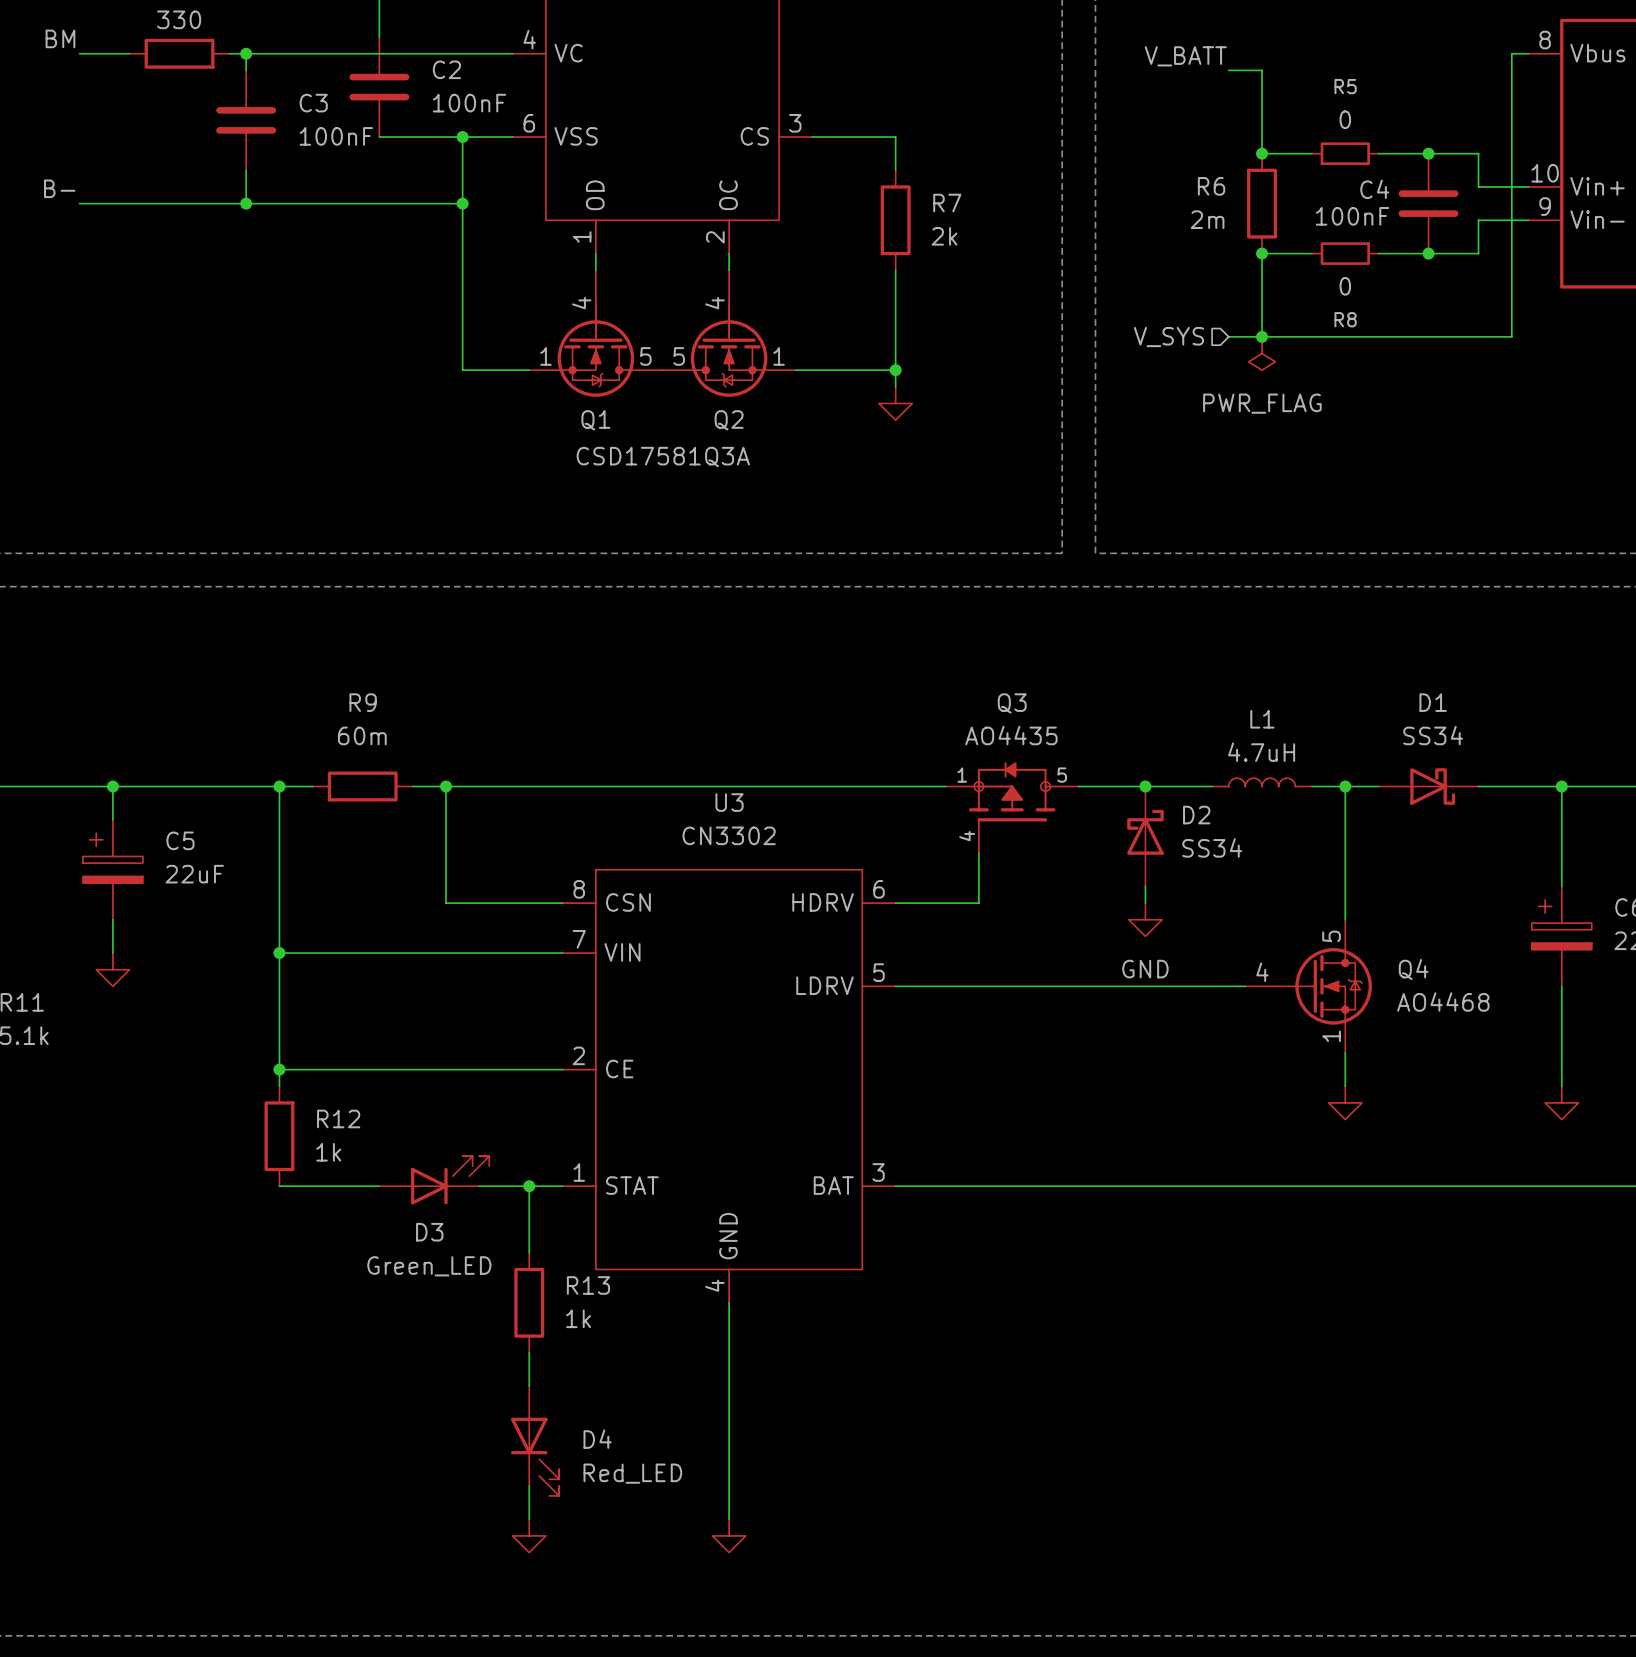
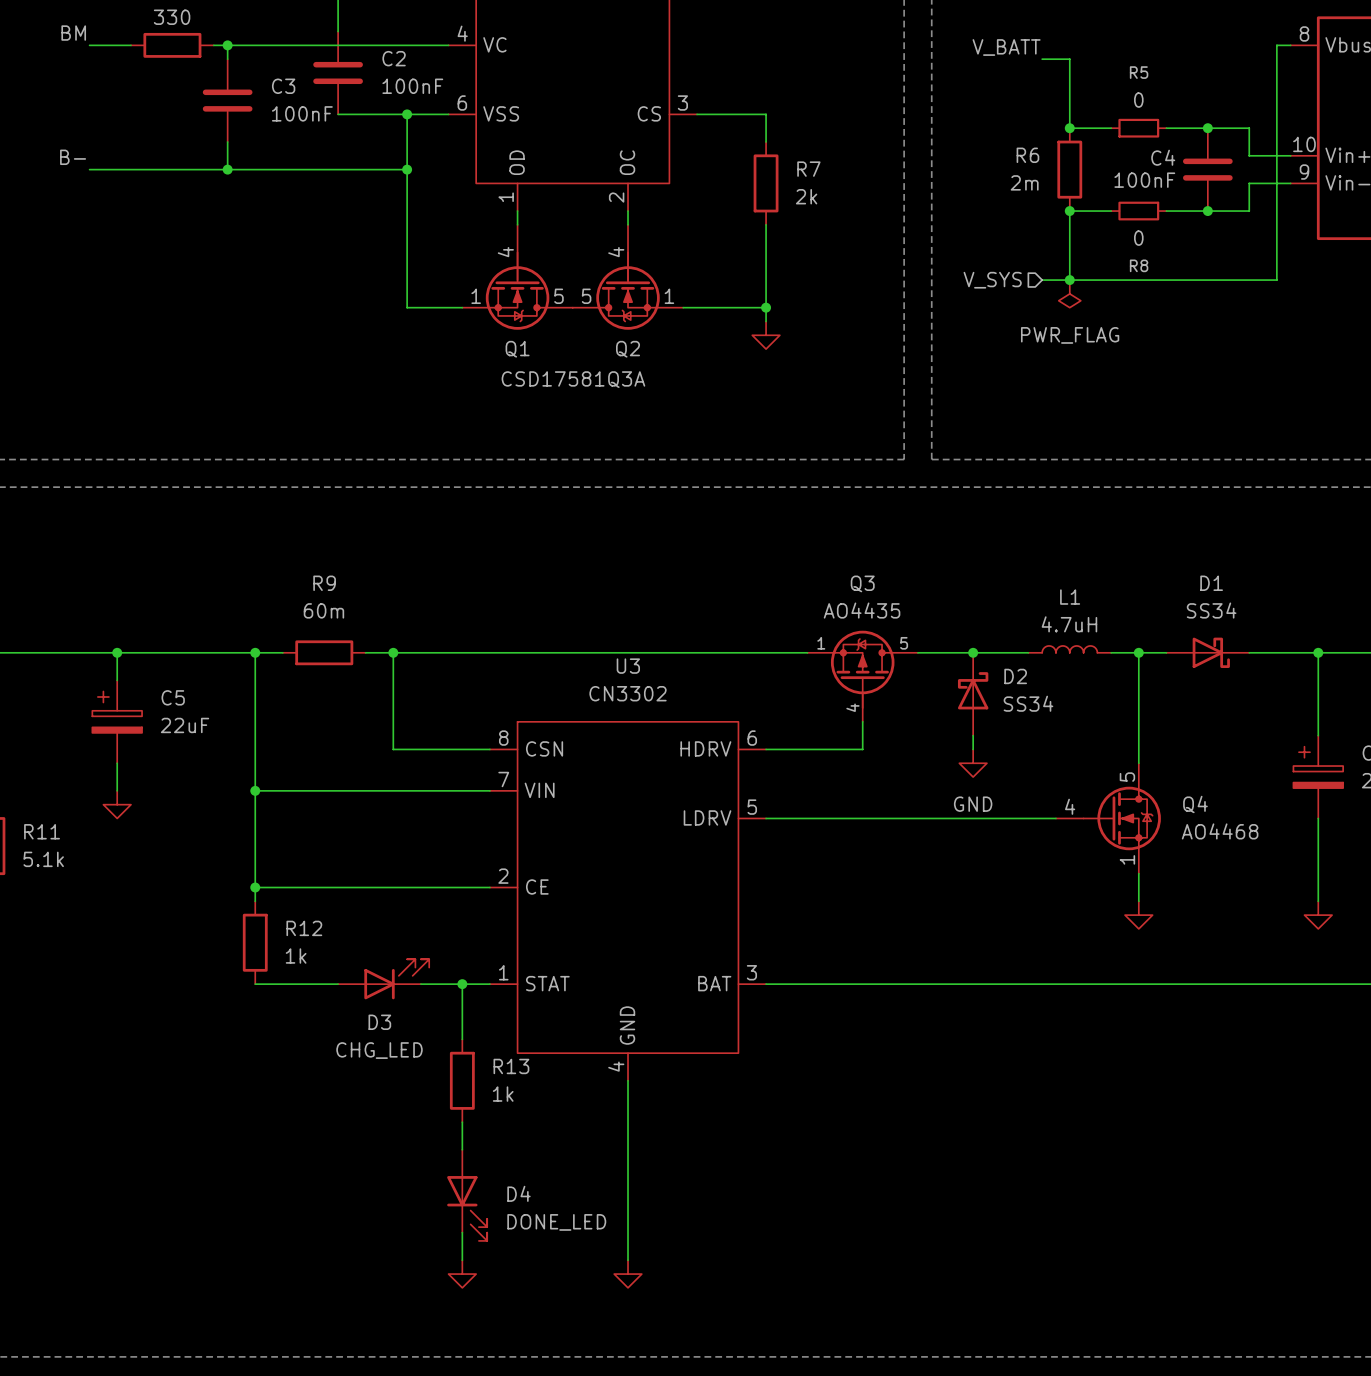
Q3 symbol: [945, 762, 1079, 854] -> [807, 630, 918, 722]
wire: (978, 853) (978, 903) -> (862, 721) (862, 749) (835, 749)
D3 value: Green_LED (429, 1266) -> CHG_LED (379, 1050)
D4 value: Red_LED (632, 1473) -> DONE_LED (556, 1222)

